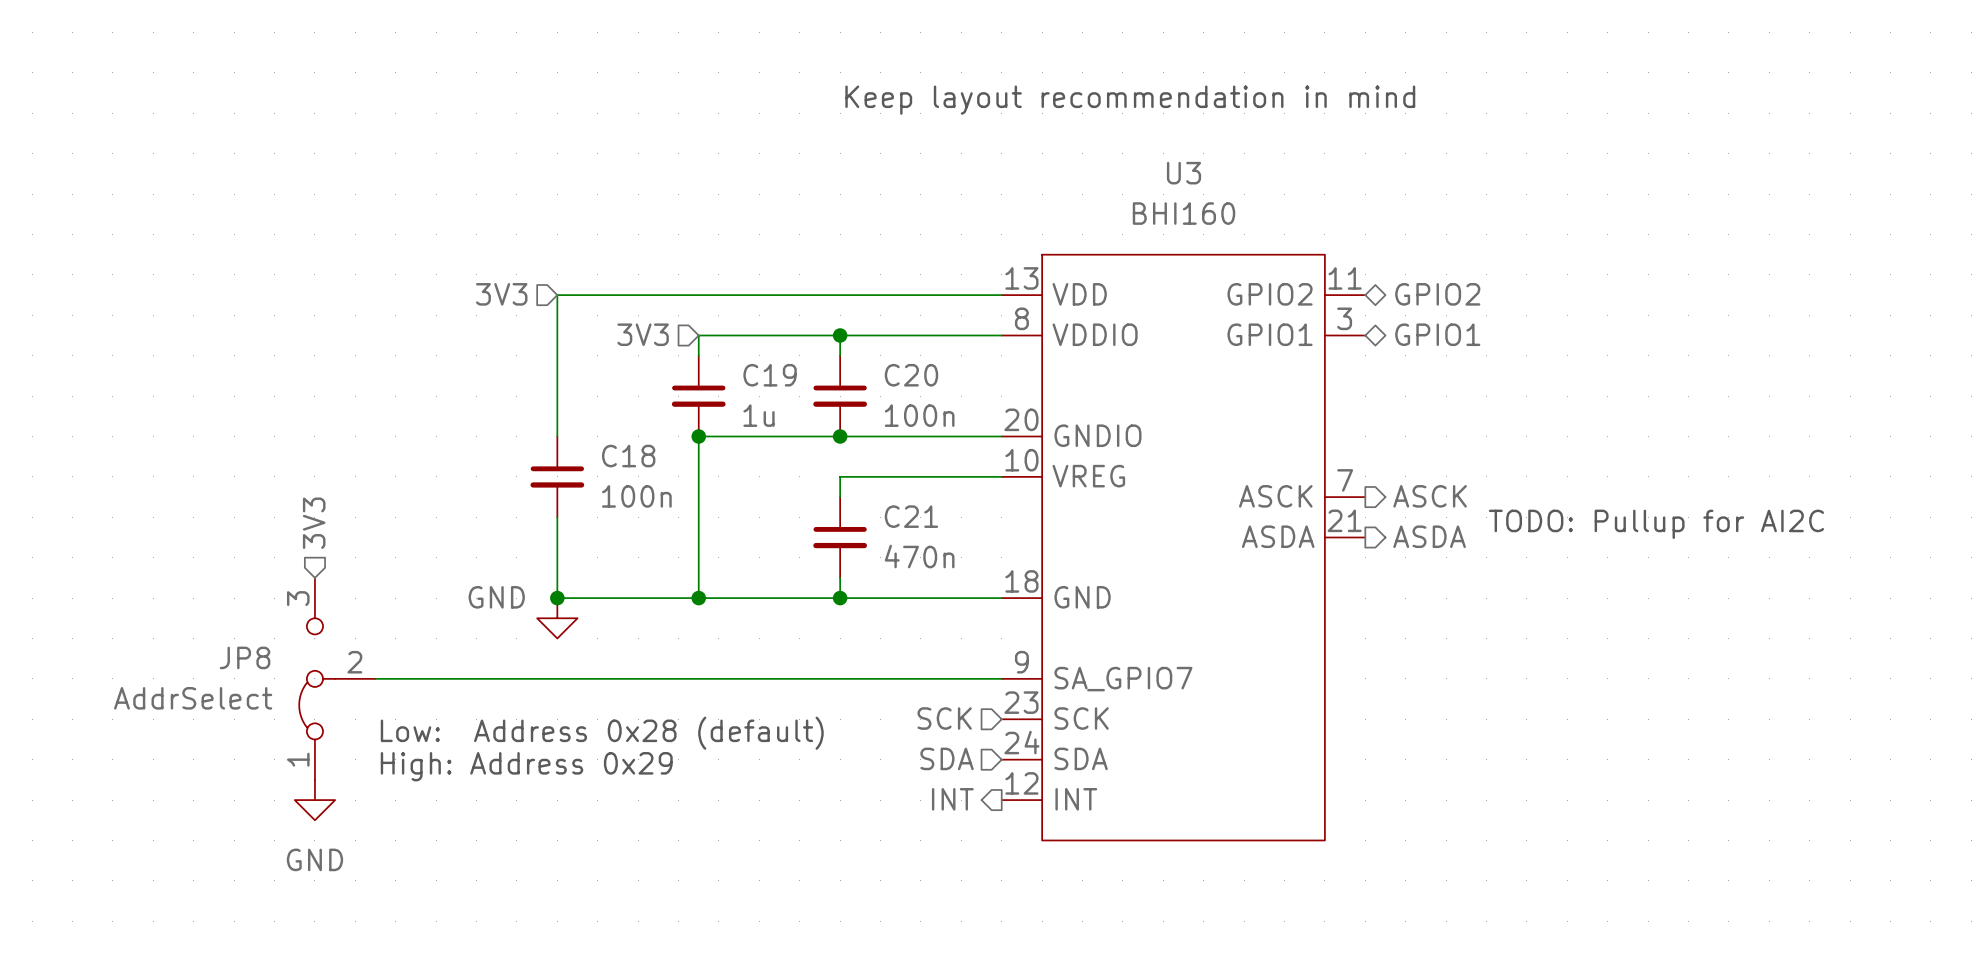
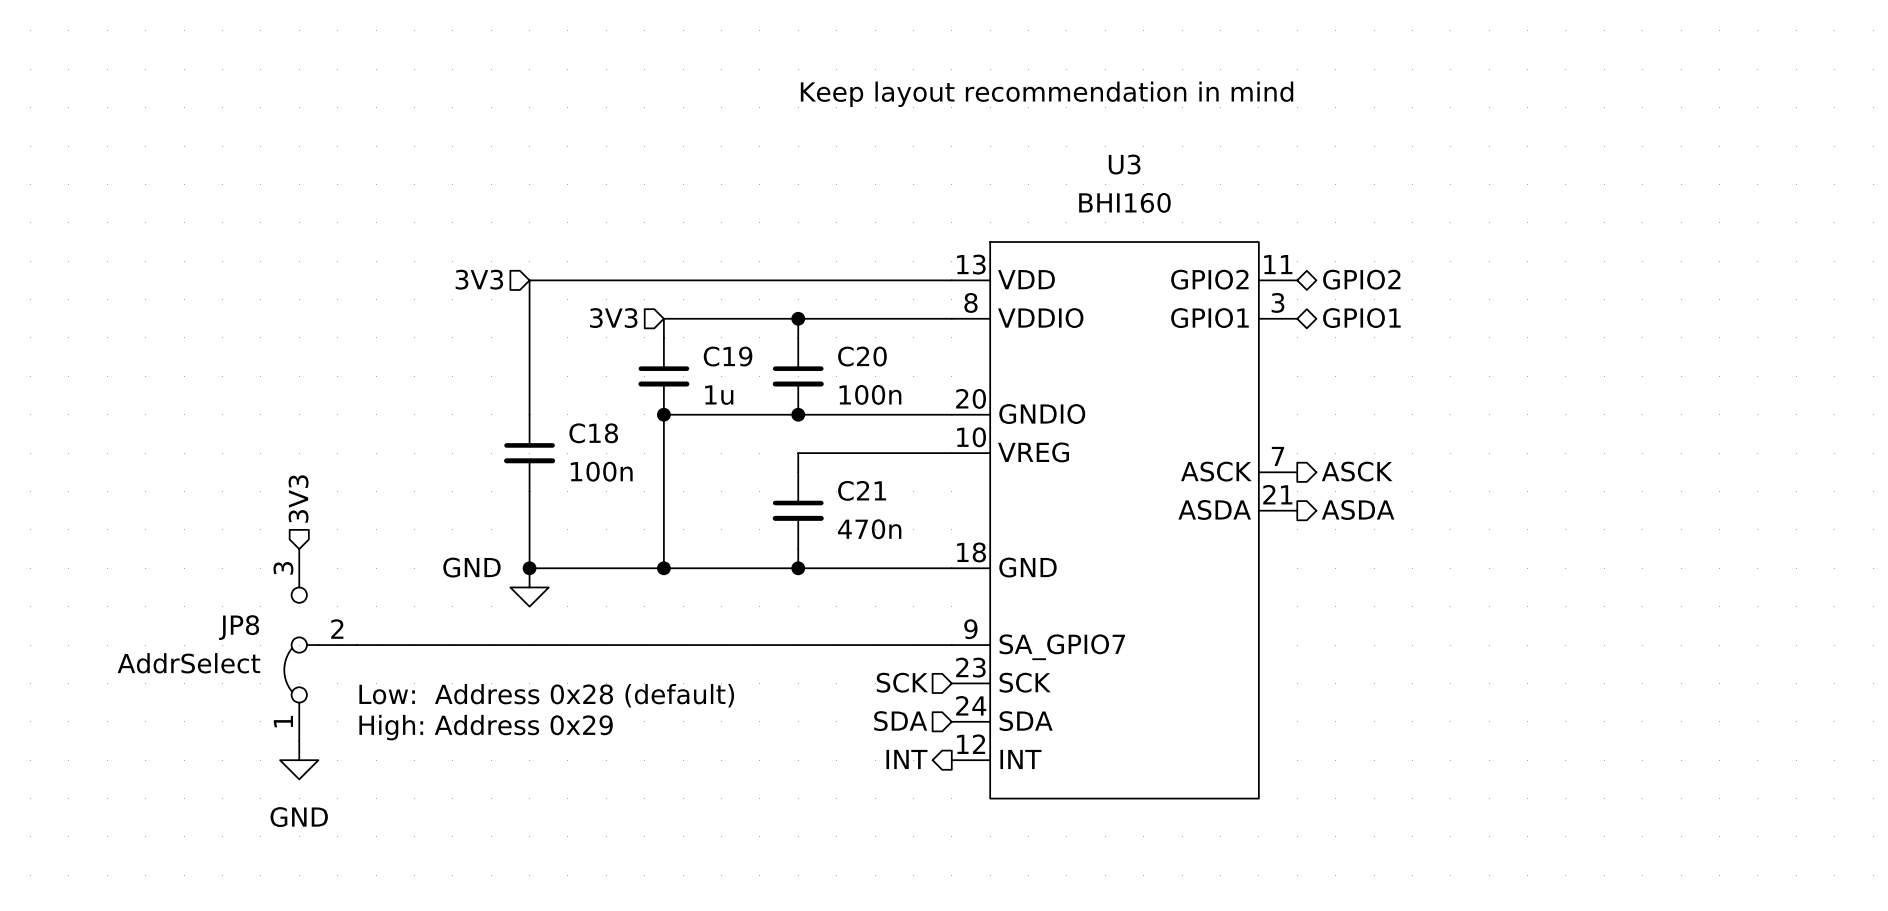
text: TODO: Pullup for AI2C (1656, 524) -> none

